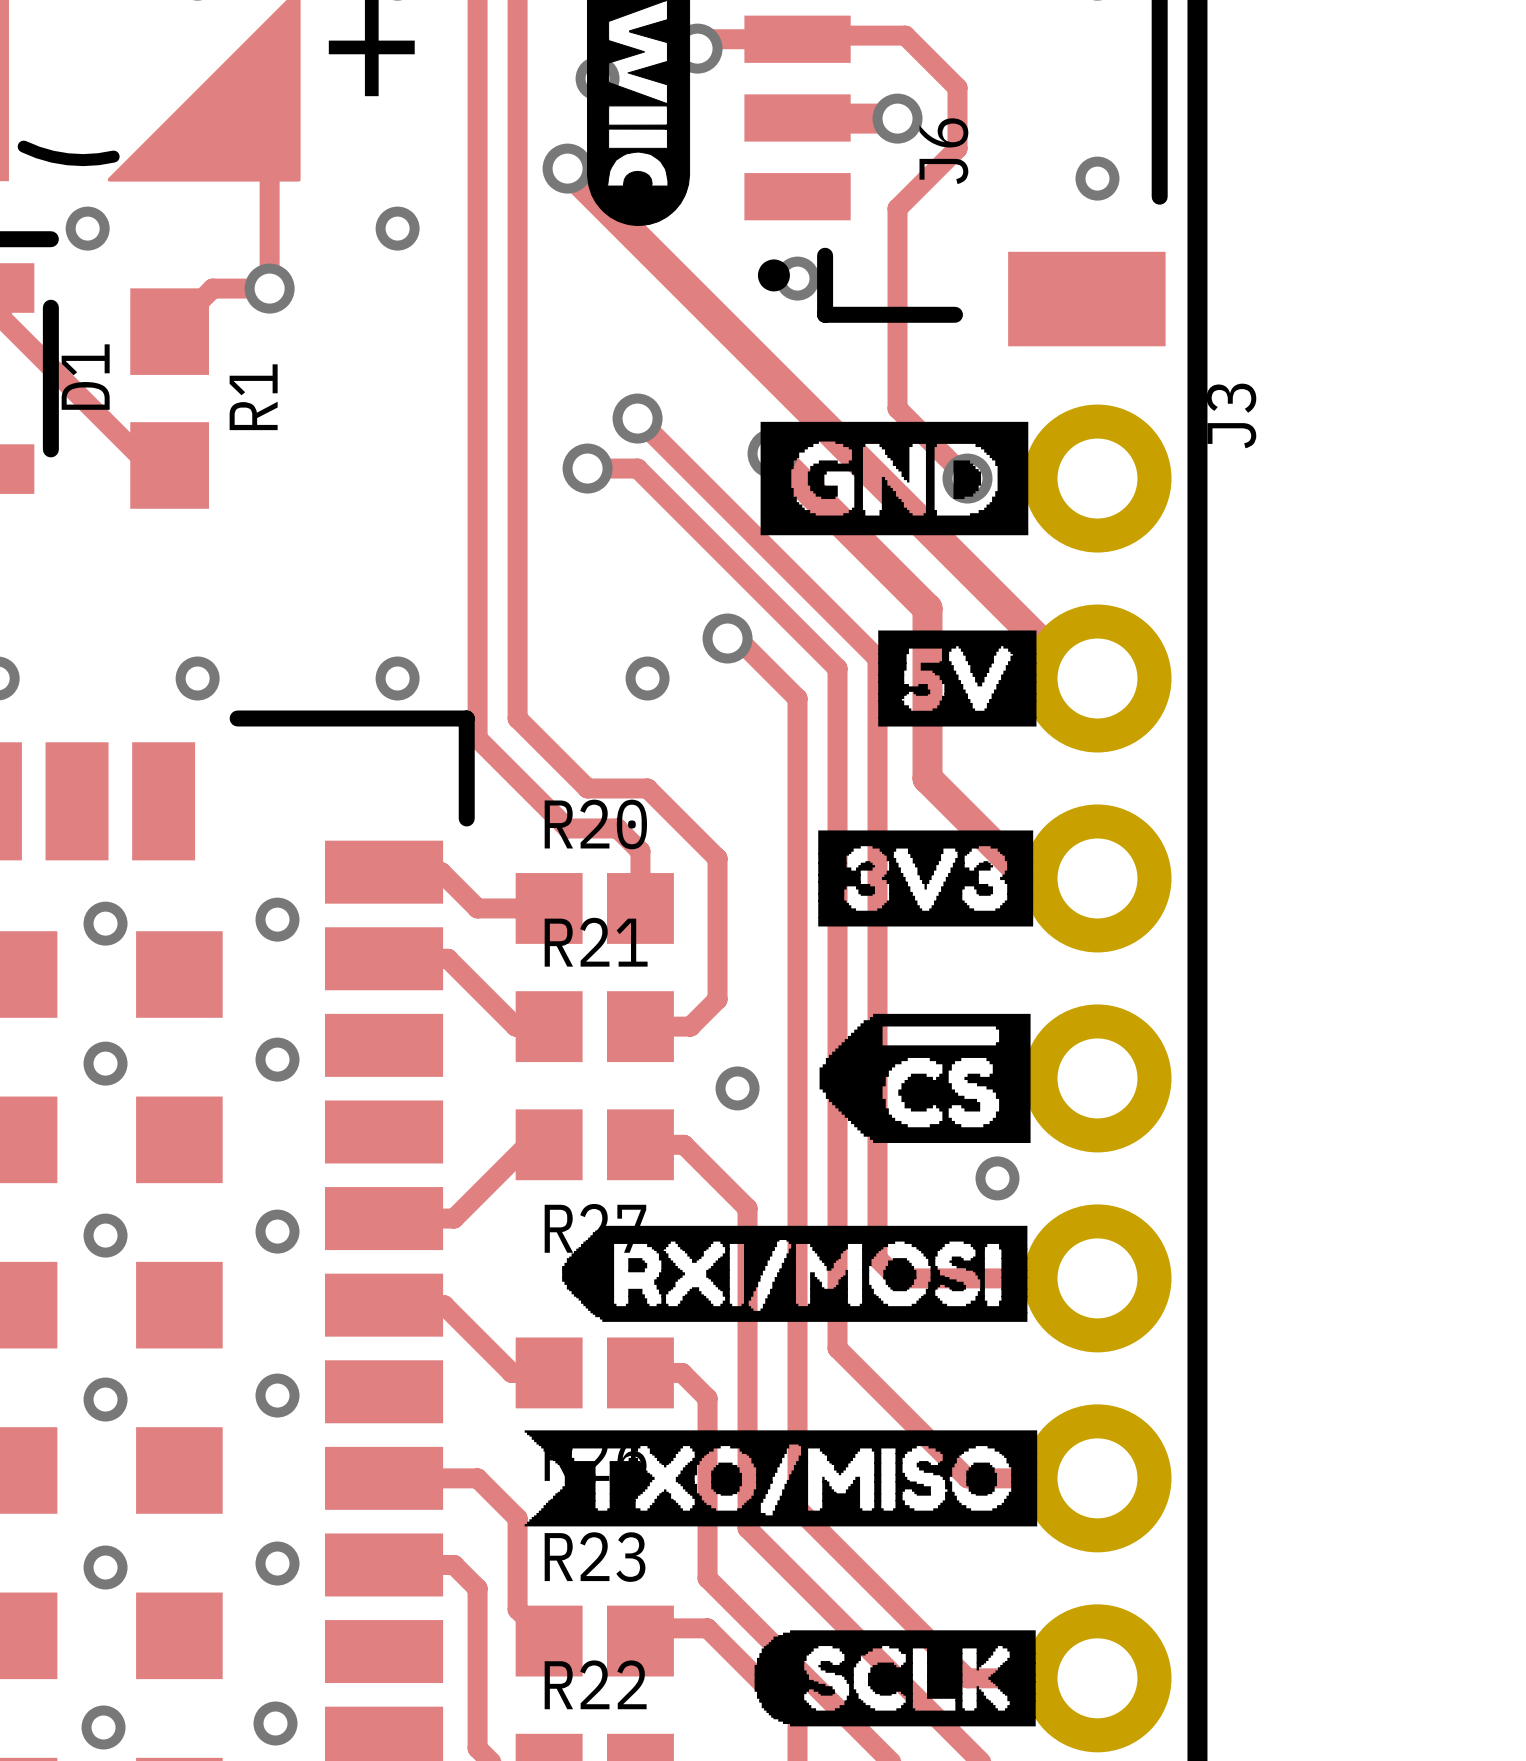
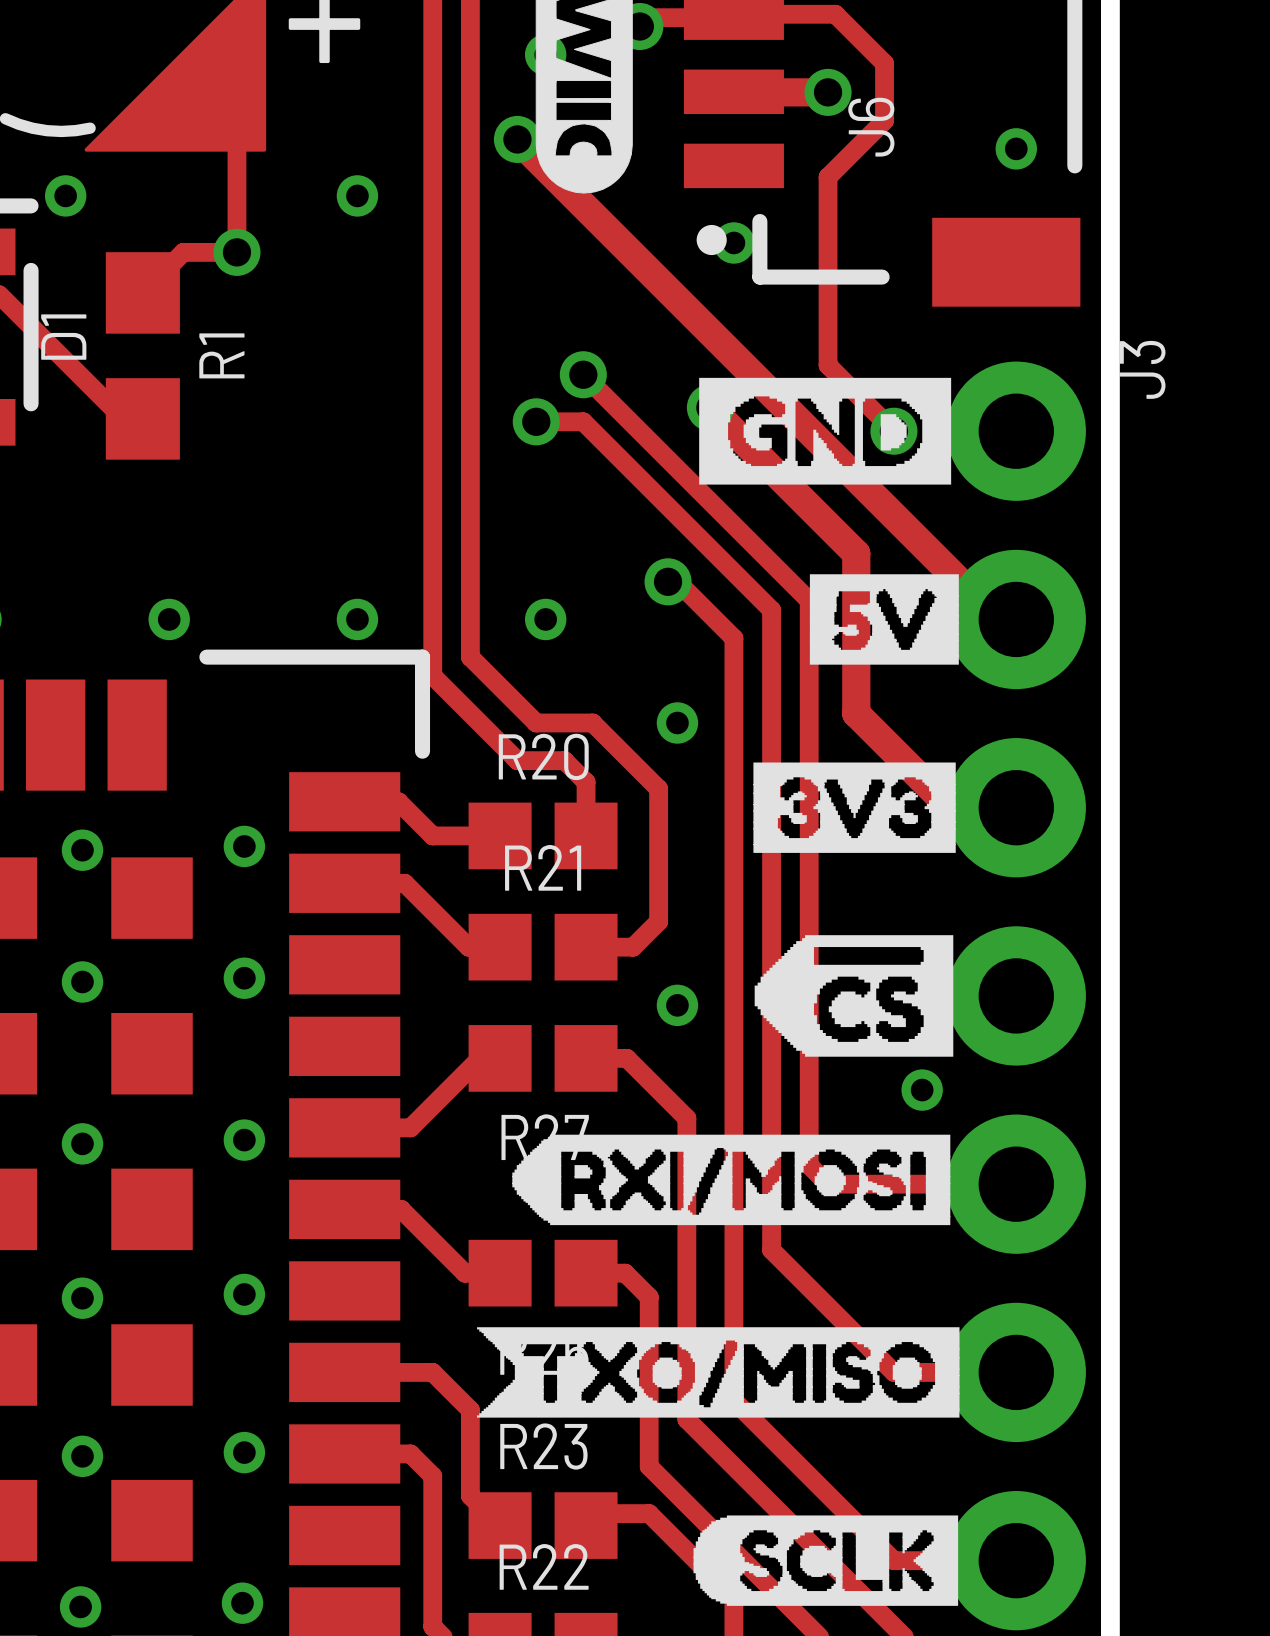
via position: (647, 678) -> (545, 619)
via: none -> (677, 722)

